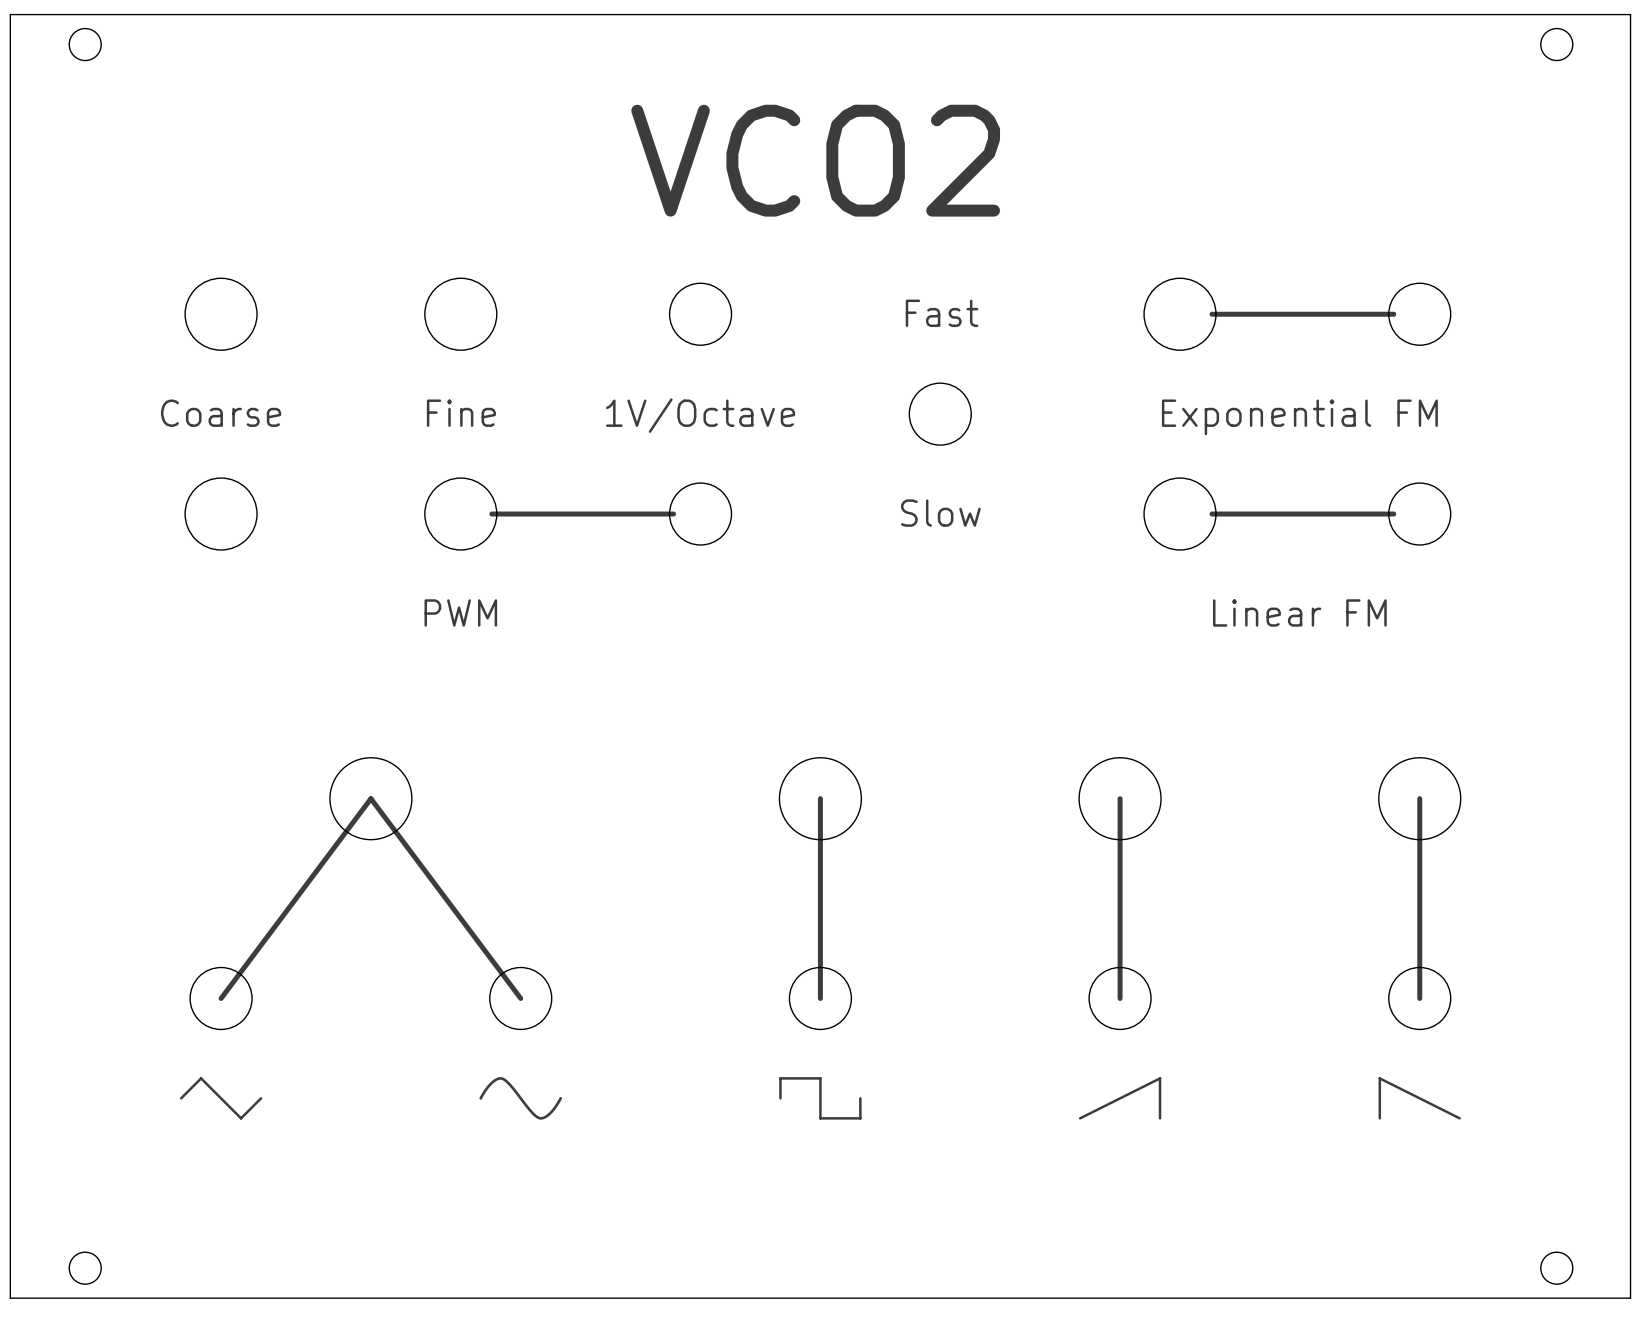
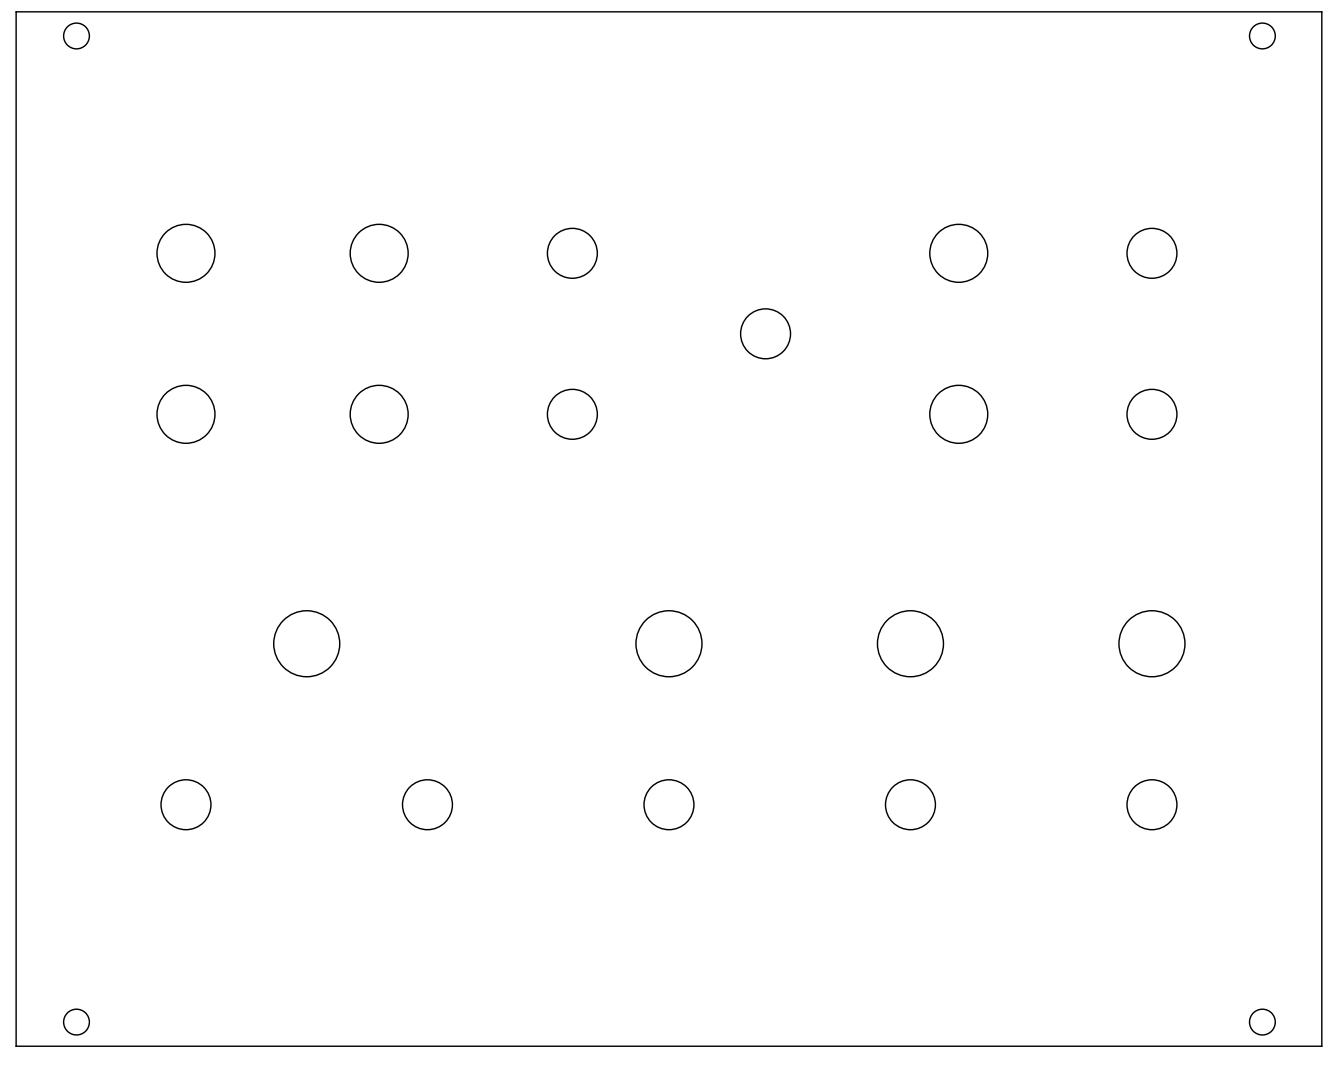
text: VCO2 (815, 160) -> none
text: Fast (942, 313) -> none
line: (1211, 314) (1393, 314) -> none
text: Coarse (221, 413) -> none
text: Fine (461, 413) -> none
text: 1V/Octave (700, 415) -> none
text: Exponential FM (1299, 417) -> none
text: Slow (940, 513) -> none
line: (491, 514) (673, 514) -> none
line: (1211, 514) (1393, 514) -> none
text: PWM (460, 612) -> none
text: Linear FM (1299, 612) -> none
line: (820, 798) (820, 998) -> none
line: (1120, 798) (1120, 998) -> none
line: (1419, 798) (1419, 998) -> none
line: (221, 998) (370, 798) (520, 998) -> none
drawing: [479, 1077, 563, 1120] -> none
line: (181, 1098) (201, 1078) (241, 1118) (261, 1098) -> none
line: (780, 1098) (780, 1078) (820, 1078) (820, 1118) (860, 1118) (860, 1098) -> none
line: (1080, 1118) (1160, 1078) (1160, 1118) -> none
line: (1379, 1118) (1379, 1078) (1459, 1118) -> none

